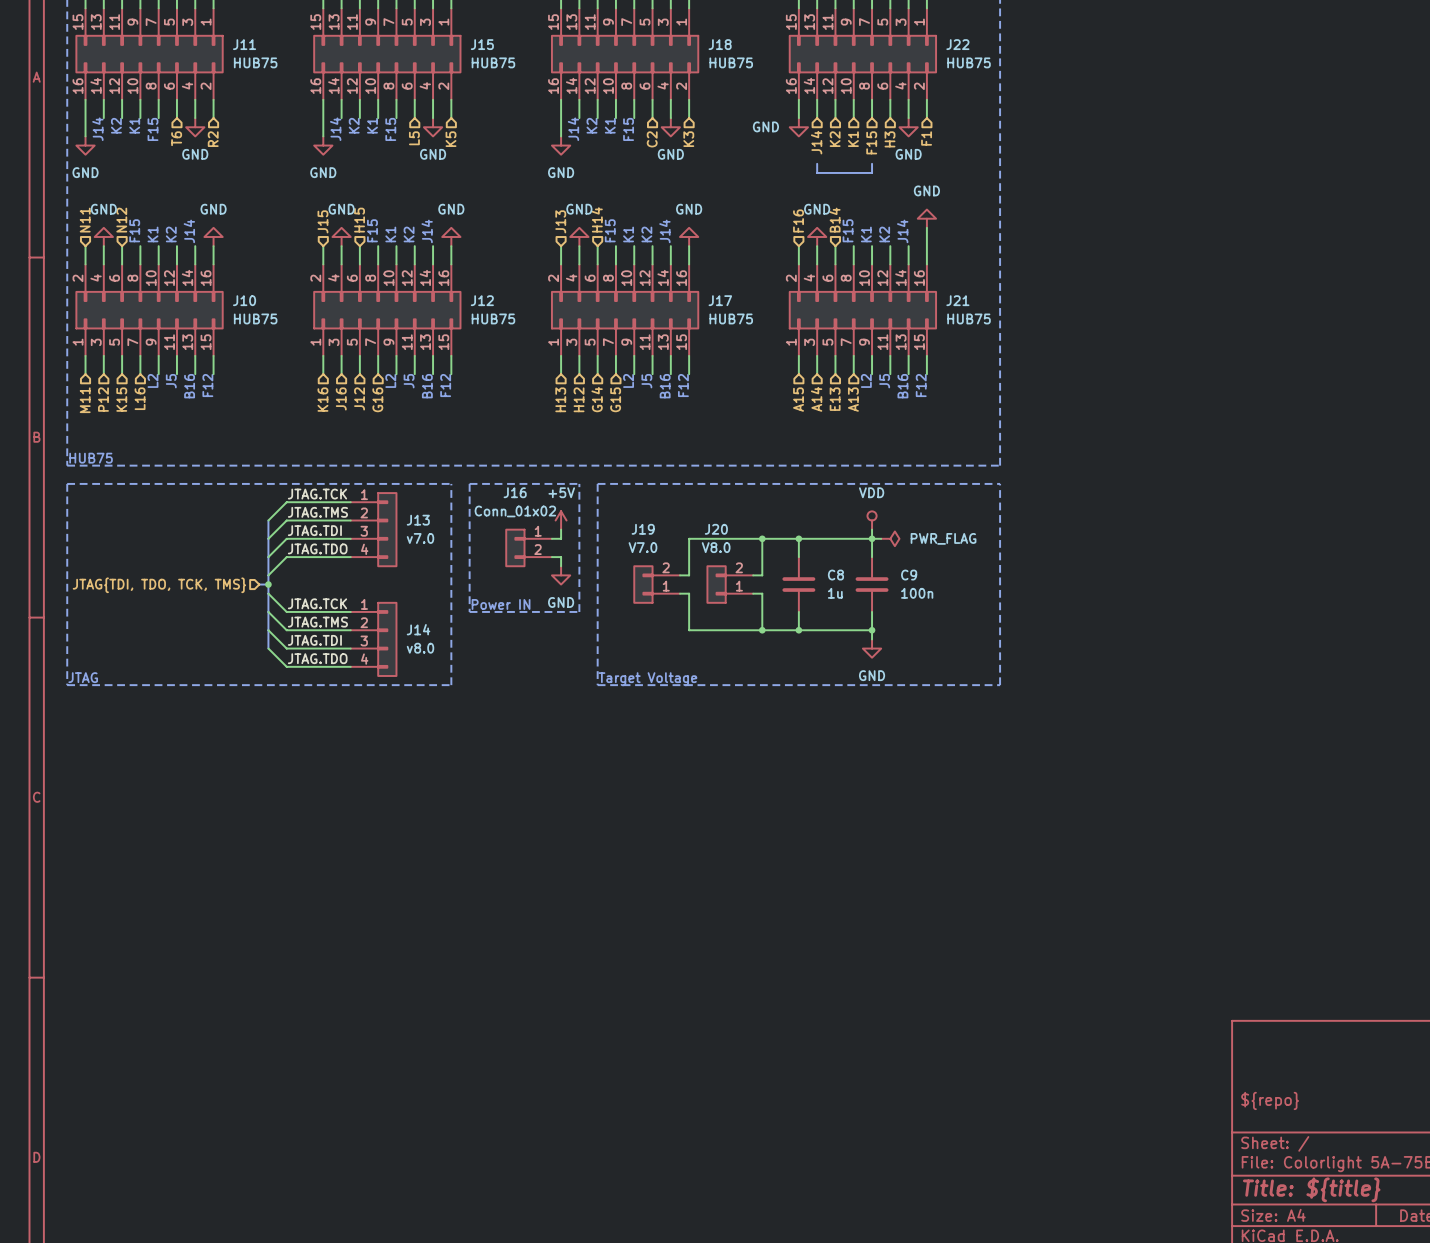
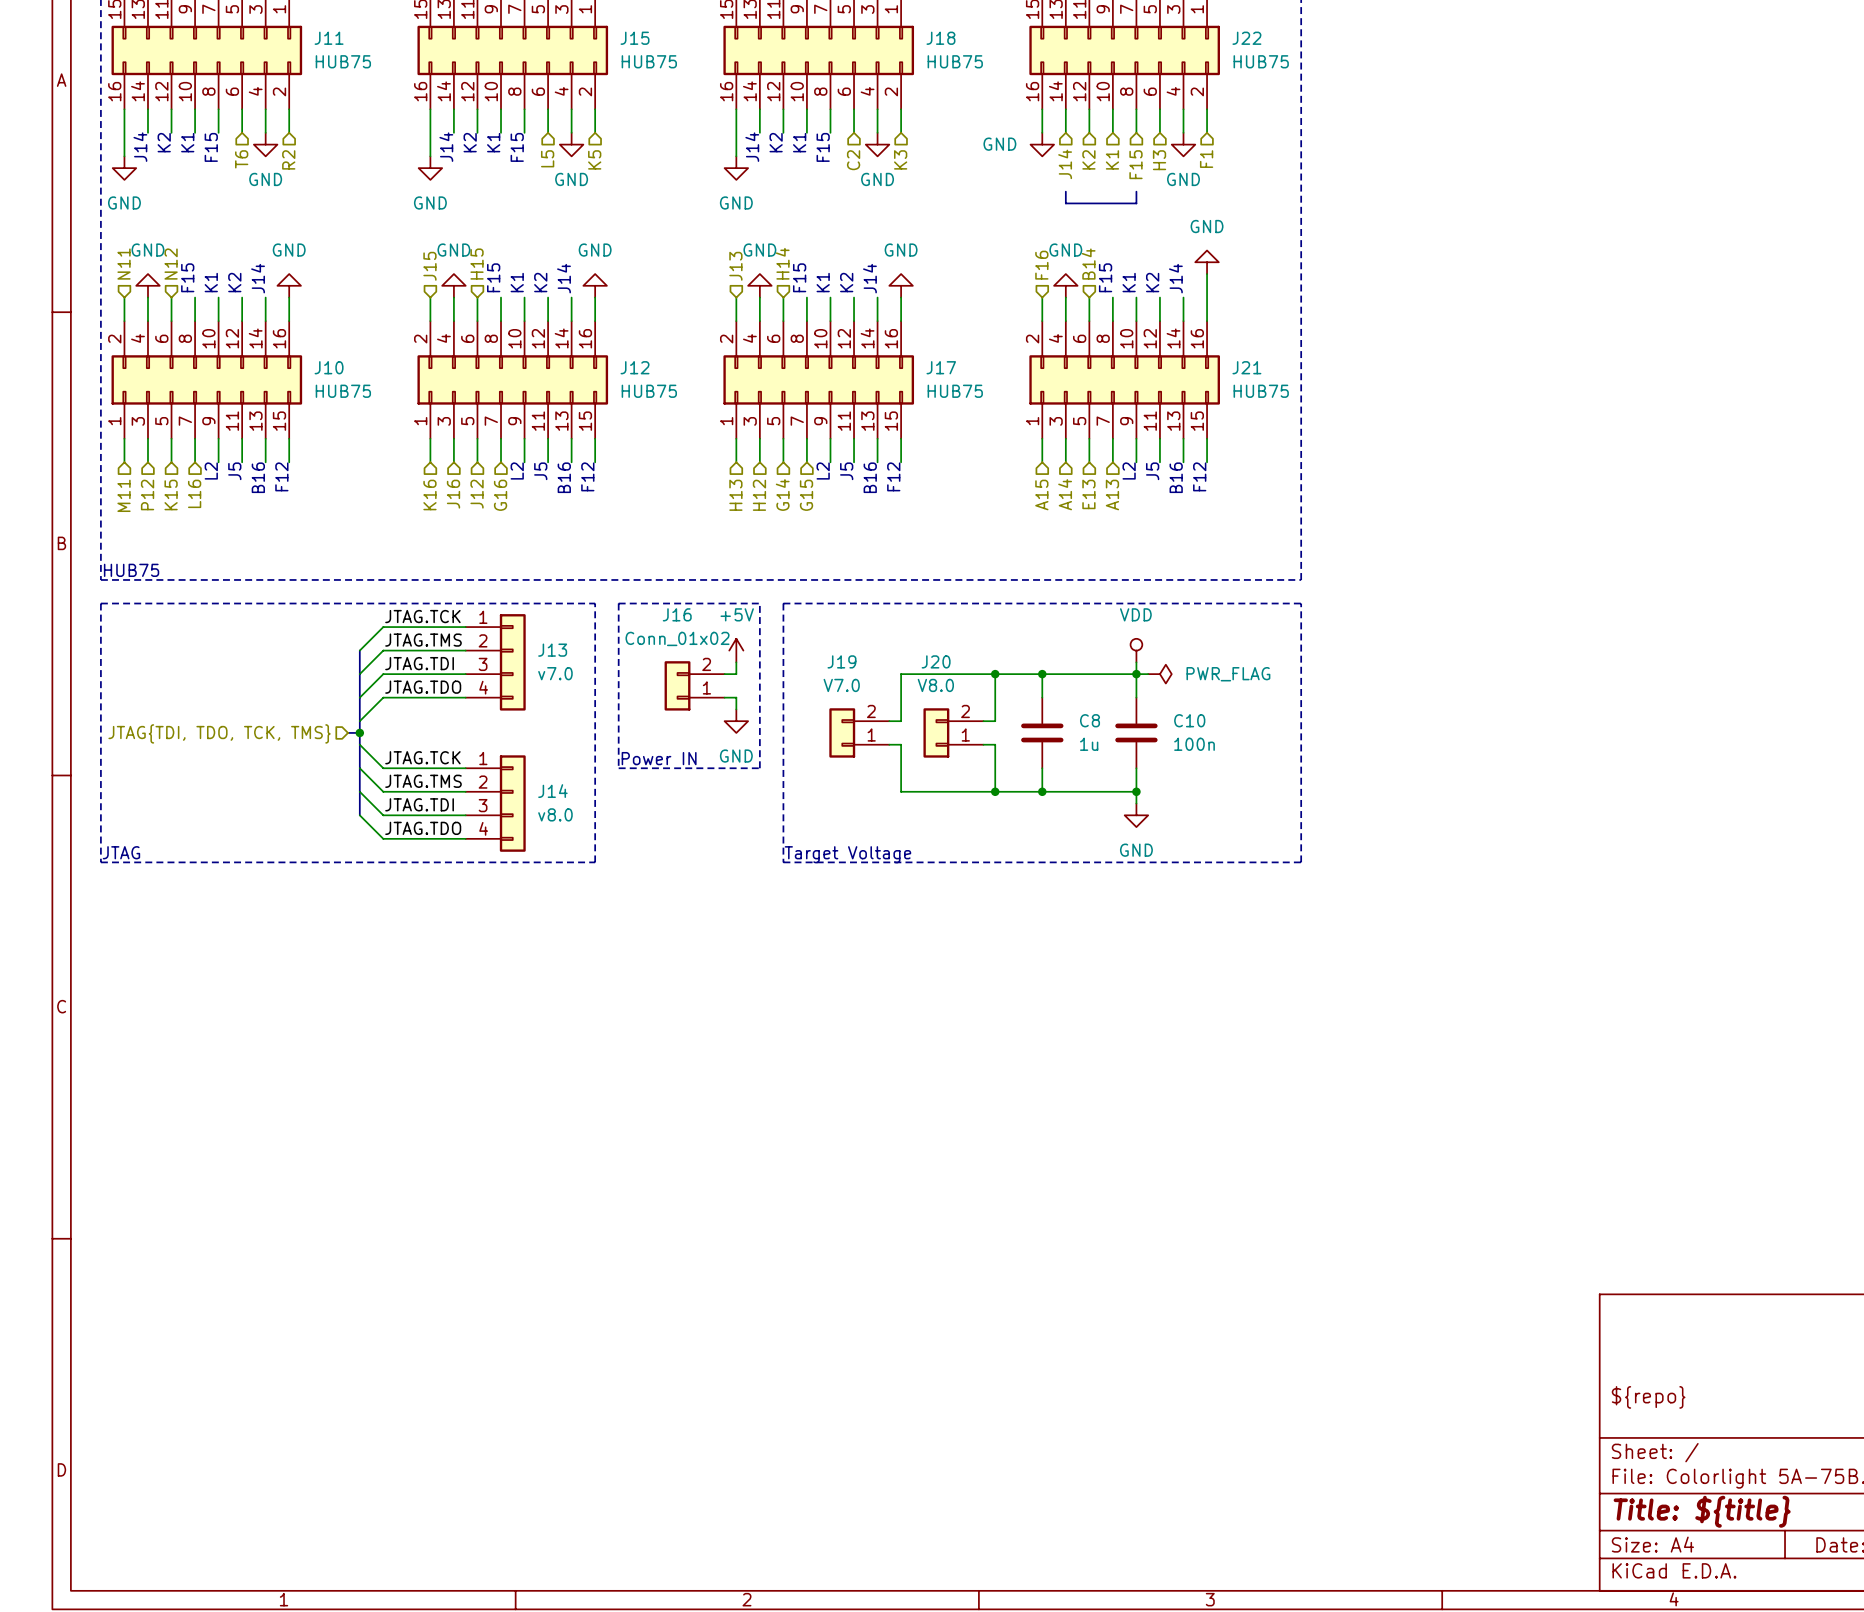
J16 flip: as is (515, 547) -> up-down (677, 685)
C9 name: C9 (909, 575) -> C10 (1189, 720)

